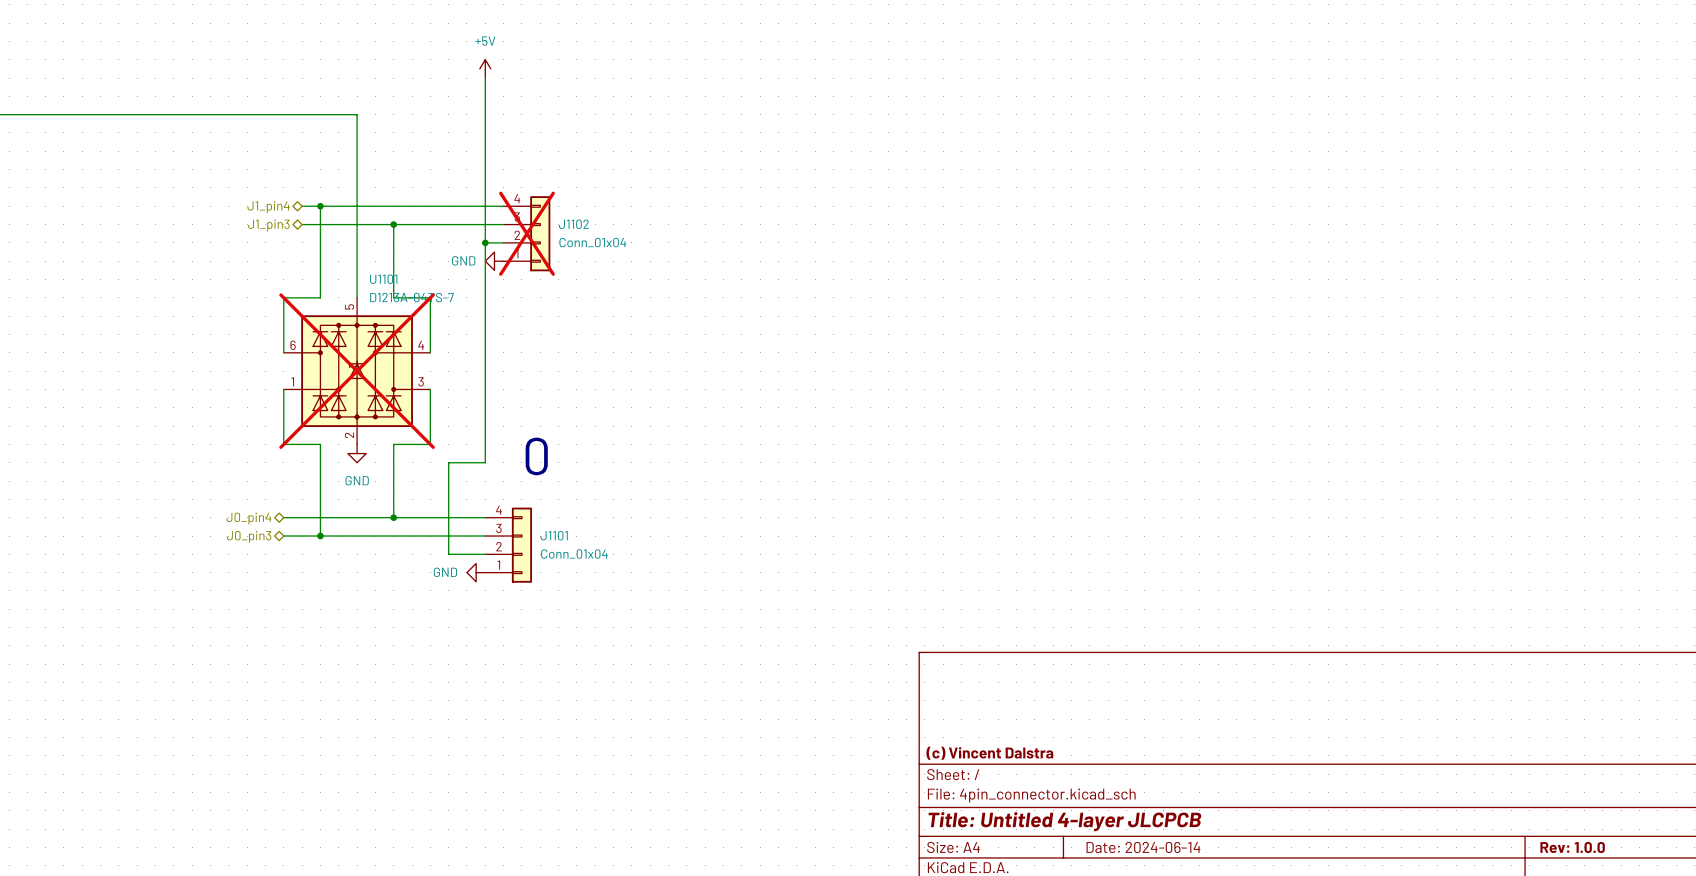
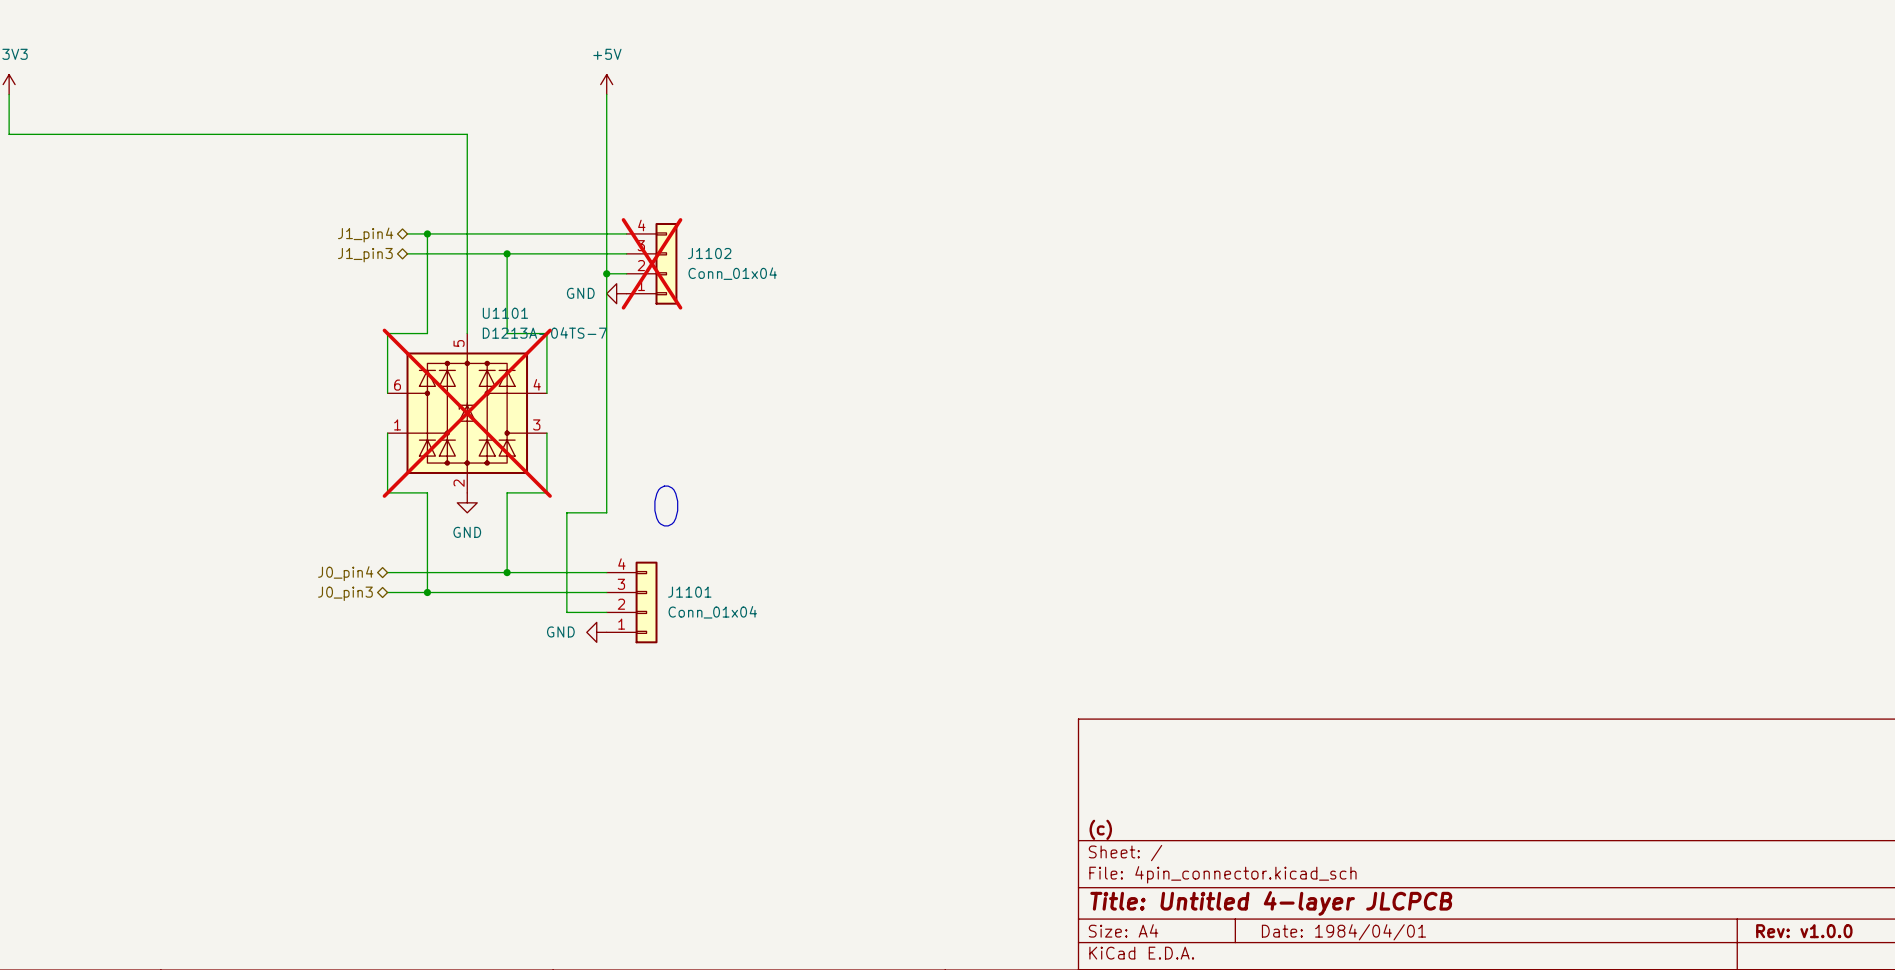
title block: (c) Vincent Dalstra (989, 753) -> (c) (1100, 829)
title block: Date: 2024-06-14 (1143, 847) -> Date: 1984/04/01 (1343, 932)
title block: Rev: 1.0.0 (1572, 847) -> Rev: v1.0.0 (1804, 931)

